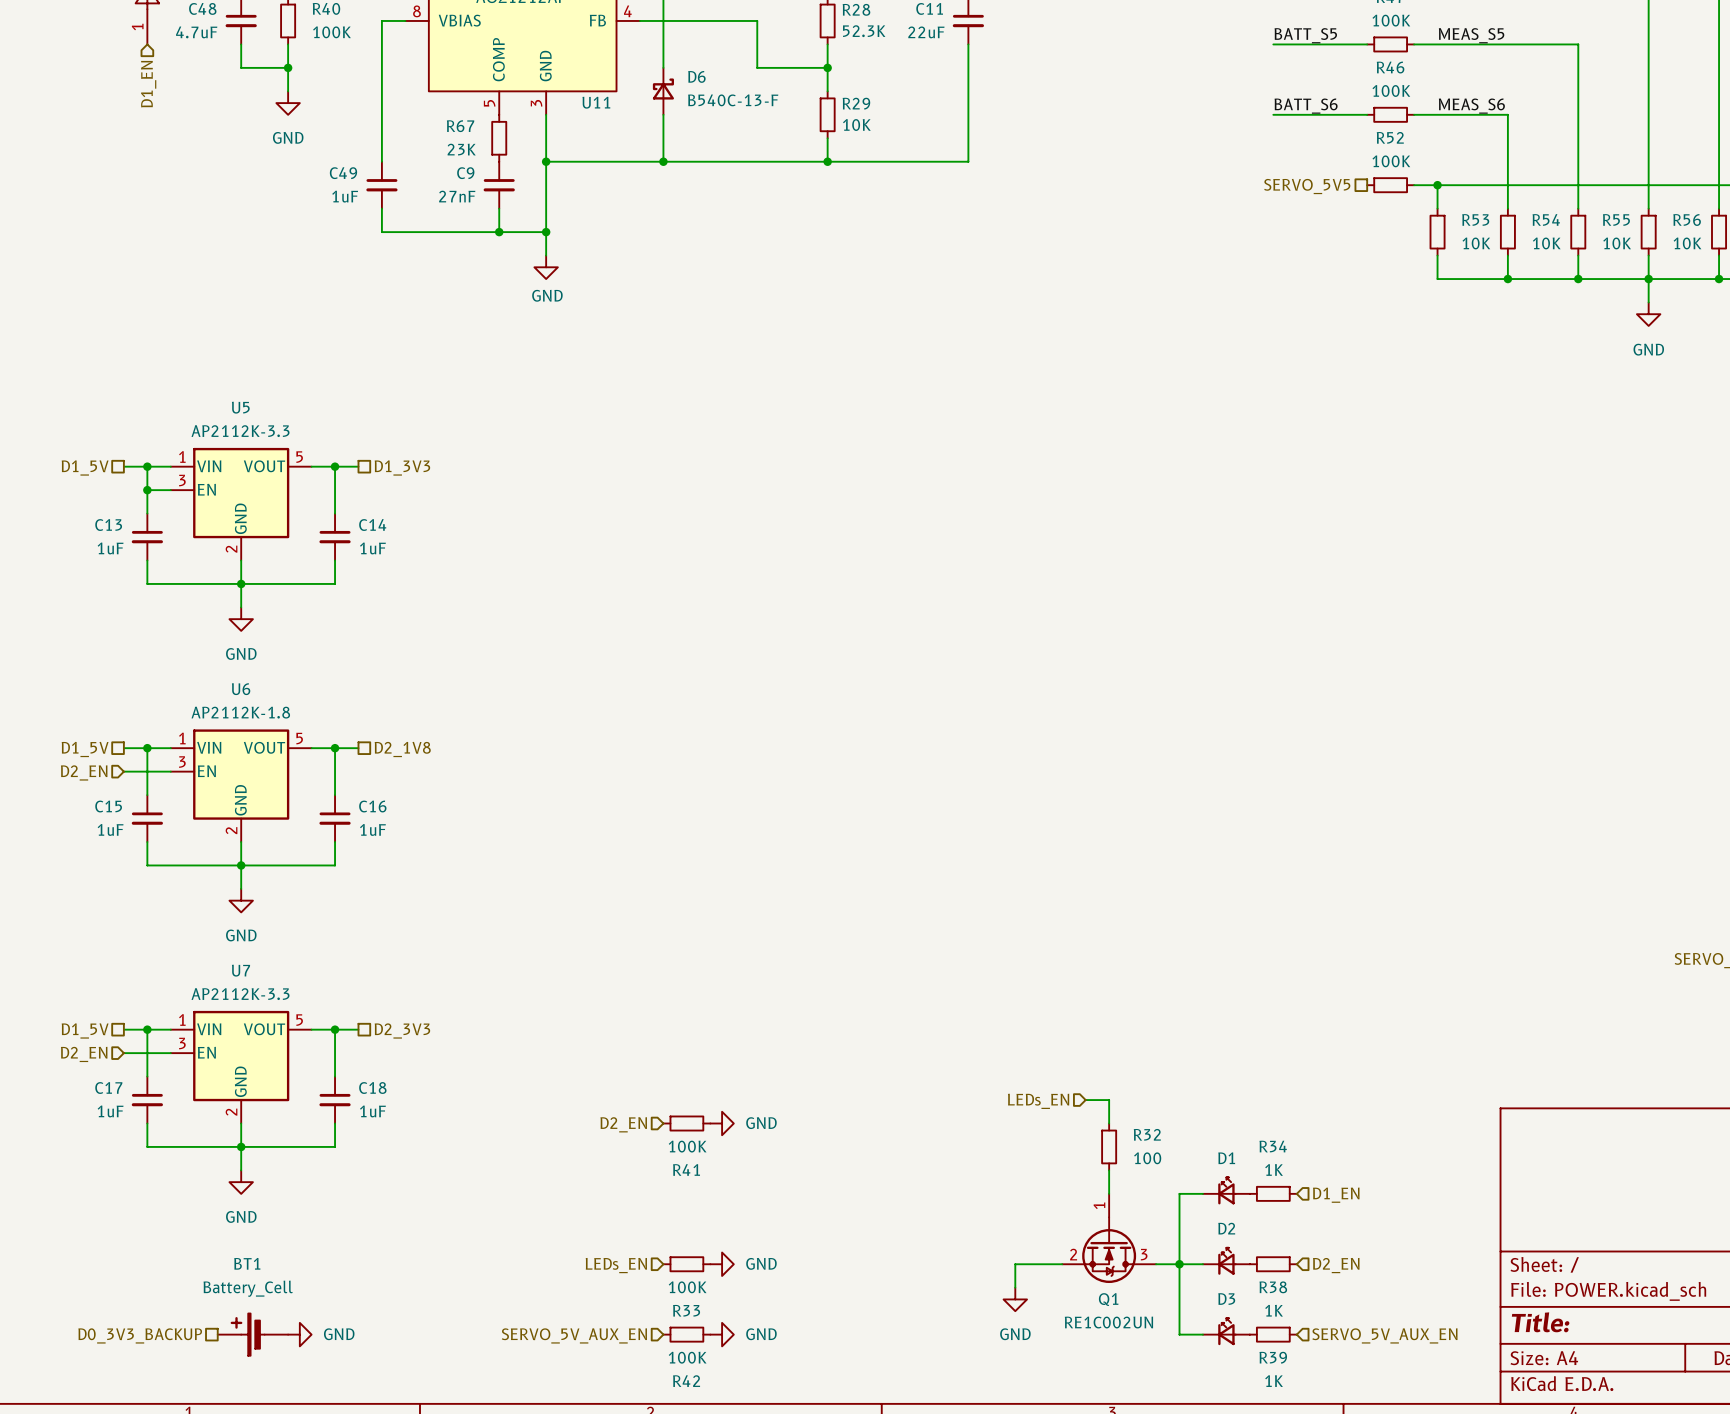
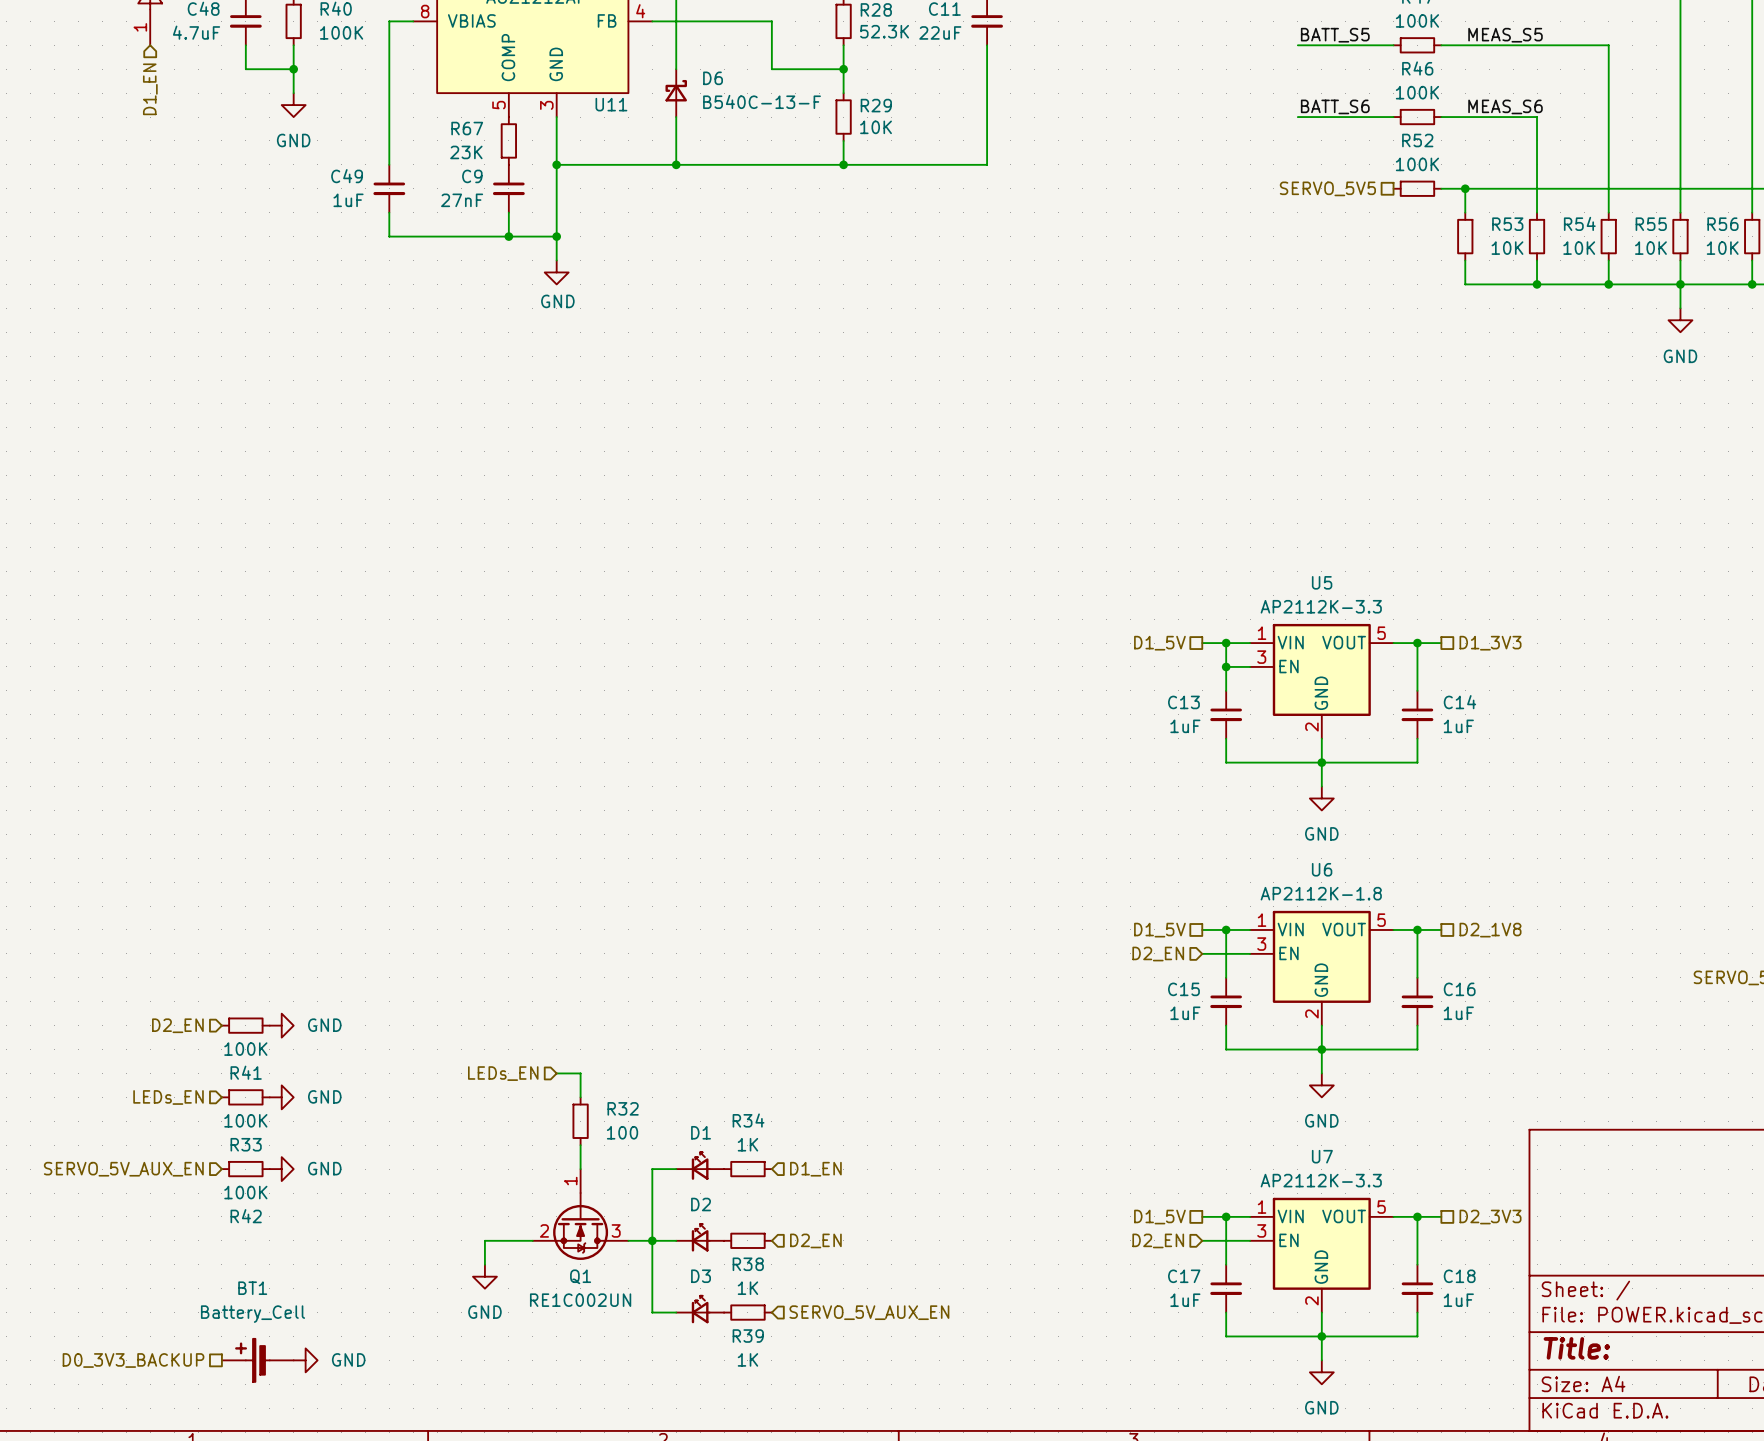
wire: (123, 466) (170, 466) -> none
wire: (147, 466) (147, 513) -> none
junction: (147, 466) -> none
wire: (311, 466) (358, 466) -> none
wire: (335, 466) (335, 513) -> none
junction: (335, 466) -> none
hierarchical label: D1_5V (85, 468) -> none
hierarchical label: D1_3V3 (402, 468) -> none
wire: (147, 490) (170, 490) -> none
junction: (147, 490) -> none
U5 position: (241, 504) -> (1321, 681)
C13 position: (147, 537) -> (1226, 714)
C14 position: (335, 537) -> (1417, 714)
wire: (147, 560) (147, 583) (335, 583) (335, 560) -> none
wire: (241, 560) (241, 607) -> none
junction: (241, 583) -> none
power symbol: GND (241, 619) -> none
wire: none -> (1202, 643) (1250, 643)
wire: none -> (1226, 643) (1226, 690)
junction: none -> (1226, 643)
wire: none -> (1393, 643) (1441, 643)
wire: none -> (1417, 643) (1417, 690)
junction: none -> (1417, 643)
hierarchical label: none -> D1_5V (1159, 643)
hierarchical label: none -> D1_3V3 (1490, 643)
wire: none -> (1226, 666) (1250, 666)
junction: none -> (1226, 666)
wire: none -> (1226, 738) (1226, 762) (1417, 762) (1417, 738)
wire: none -> (1321, 738) (1321, 786)
wire: (123, 748) (170, 748) -> none
wire: (147, 748) (147, 795) -> none
junction: (147, 748) -> none
wire: (311, 748) (358, 748) -> none
wire: (335, 748) (335, 795) -> none
junction: (335, 748) -> none
junction: none -> (1321, 762)
hierarchical label: D1_5V (85, 749) -> none
hierarchical label: D2_1V8 (402, 749) -> none
wire: (123, 771) (170, 771) -> none
hierarchical label: D2_EN (84, 772) -> none
power symbol: none -> GND (1321, 798)
U6 position: (241, 785) -> (1321, 968)
C15 position: (147, 818) -> (1226, 1001)
C16 position: (335, 818) -> (1417, 1001)
wire: (147, 842) (147, 865) (335, 865) (335, 842) -> none
wire: (241, 842) (241, 888) -> none
junction: (241, 865) -> none
power symbol: GND (241, 900) -> none
wire: none -> (1202, 929) (1250, 929)
wire: none -> (1226, 929) (1226, 977)
junction: none -> (1226, 929)
wire: none -> (1393, 929) (1441, 929)
wire: none -> (1417, 929) (1417, 977)
junction: none -> (1417, 929)
hierarchical label: none -> D1_5V (1159, 930)
hierarchical label: none -> D2_1V8 (1490, 930)
wire: none -> (1202, 953) (1250, 953)
hierarchical label: none -> D2_EN (1158, 954)
power symbol: none -> GND (281, 1025)
wire: none -> (1226, 1025) (1226, 1049) (1417, 1049) (1417, 1025)
wire: none -> (1321, 1025) (1321, 1073)
wire: (123, 1029) (170, 1029) -> none
wire: (147, 1029) (147, 1076) -> none
junction: (147, 1029) -> none
wire: (311, 1029) (358, 1029) -> none
wire: (335, 1029) (335, 1076) -> none
junction: (335, 1029) -> none
junction: none -> (1321, 1049)
hierarchical label: D1_5V (85, 1030) -> none
hierarchical label: D2_3V3 (402, 1030) -> none
wire: (123, 1053) (170, 1053) -> none
wire: none -> (556, 1073) (580, 1073) (580, 1097)
hierarchical label position: D2_EN (84, 1054) -> D2_EN (177, 1025)
hierarchical label: none -> LEDs_EN (503, 1073)
power symbol: none -> GND (1321, 1085)
U7 position: (241, 1067) -> (1321, 1255)
power symbol: none -> GND (281, 1097)
hierarchical label: none -> LEDs_EN (168, 1097)
C17 position: (147, 1100) -> (1226, 1288)
C18 position: (335, 1100) -> (1417, 1288)
wire: (1085, 1100) (1109, 1100) (1109, 1123) -> none
hierarchical label: LEDs_EN (1038, 1101) -> none
wire: (147, 1123) (147, 1146) (335, 1146) (335, 1123) -> none
wire: (241, 1123) (241, 1170) -> none
wire: none -> (580, 1145) (580, 1169)
R41 position: (686, 1123) -> (245, 1025)
power symbol: GND (722, 1123) -> none
hierarchical label rotation: 0° (623, 1124) -> 180° (815, 1240)
hierarchical label position: D2_EN (623, 1124) -> D2_EN (815, 1240)
junction: (241, 1146) -> none
wire: none -> (676, 1169) (652, 1169) (652, 1312) (676, 1312)
R32 position: (1109, 1146) -> (580, 1121)
hierarchical label: none -> SERVO_5V_AUX_EN (123, 1169)
hierarchical label: none -> D1_EN (815, 1169)
wire: (1109, 1170) (1109, 1193) -> none
power symbol rotation: 0° (241, 1182) -> 90° counterclockwise (281, 1169)
power symbol position: GND (241, 1182) -> GND (281, 1169)
D1 position: (1226, 1190) -> (700, 1166)
wire: (1179, 1193) (1179, 1334) (1202, 1334) -> none
junction: none -> (1226, 1216)
wire: none -> (1250, 1216) (1226, 1216) (1226, 1264)
R34 position: (1273, 1193) -> (747, 1169)
wire: none -> (1393, 1216) (1441, 1216)
wire: none -> (1417, 1216) (1417, 1264)
junction: none -> (1417, 1216)
hierarchical label: none -> D1_5V (1159, 1217)
hierarchical label: D1_EN (1336, 1195) -> none
hierarchical label: none -> D2_3V3 (1490, 1217)
wire: none -> (532, 1240) (484, 1240) (484, 1264)
wire: none -> (628, 1240) (676, 1240)
junction: none -> (652, 1240)
Q1 position: (1109, 1238) -> (580, 1214)
power symbol: none -> GND (484, 1276)
D2 position: (1226, 1261) -> (700, 1237)
R33 position: (686, 1264) -> (245, 1097)
power symbol: GND (722, 1264) -> none
wire: (1062, 1264) (1015, 1264) (1015, 1287) -> none
wire: (1156, 1264) (1202, 1264) -> (1202, 1240) (1250, 1240)
junction: (1179, 1264) -> none
R38 position: (1273, 1264) -> (747, 1240)
hierarchical label: LEDs_EN (616, 1265) -> none
hierarchical label rotation: 0° (1336, 1265) -> 180° (1158, 1240)
hierarchical label position: D2_EN (1336, 1265) -> D2_EN (1158, 1240)
wire: none -> (1226, 1312) (1226, 1336) (1417, 1336) (1417, 1312)
wire: none -> (1321, 1312) (1321, 1360)
power symbol: GND (1015, 1299) -> none
junction: none -> (1321, 1336)
D3 position: (1226, 1331) -> (700, 1309)
R42 position: (686, 1334) -> (245, 1169)
power symbol: GND (722, 1334) -> none
R39 position: (1273, 1334) -> (747, 1312)
hierarchical label rotation: 0° (574, 1335) -> 180° (869, 1312)
hierarchical label position: SERVO_5V_AUX_EN (574, 1335) -> SERVO_5V_AUX_EN (869, 1312)
hierarchical label: SERVO_5V_AUX_EN (1384, 1335) -> none
power symbol: none -> GND (1321, 1372)

